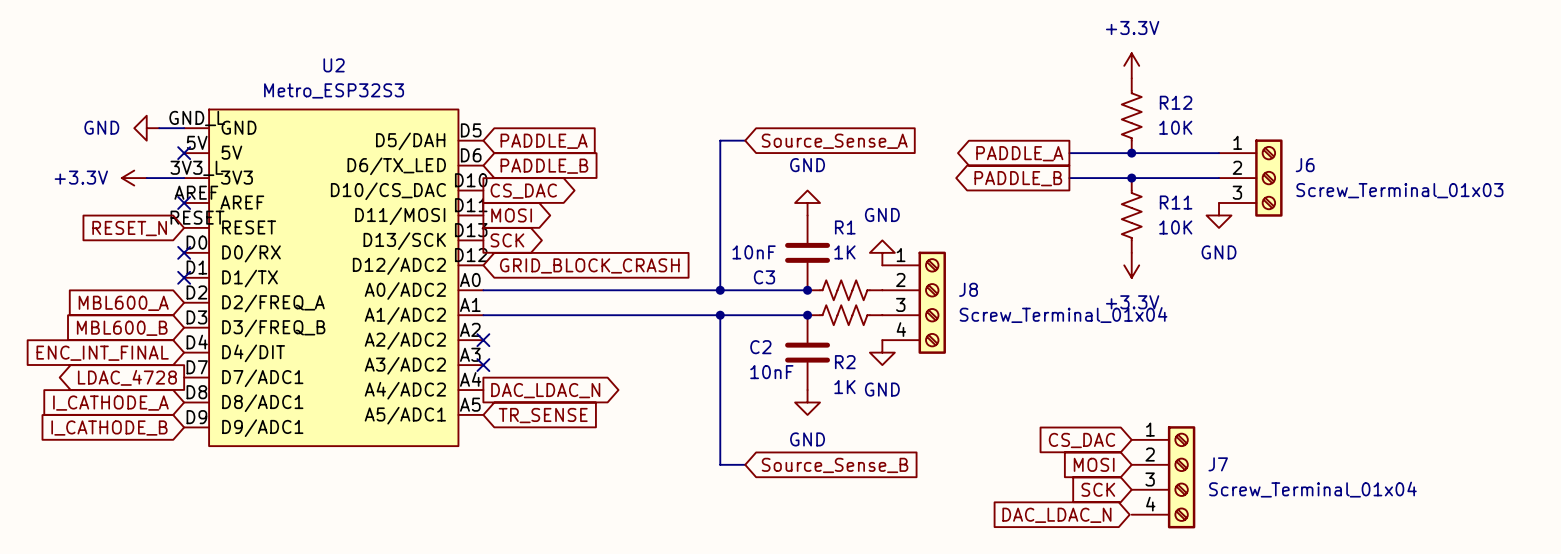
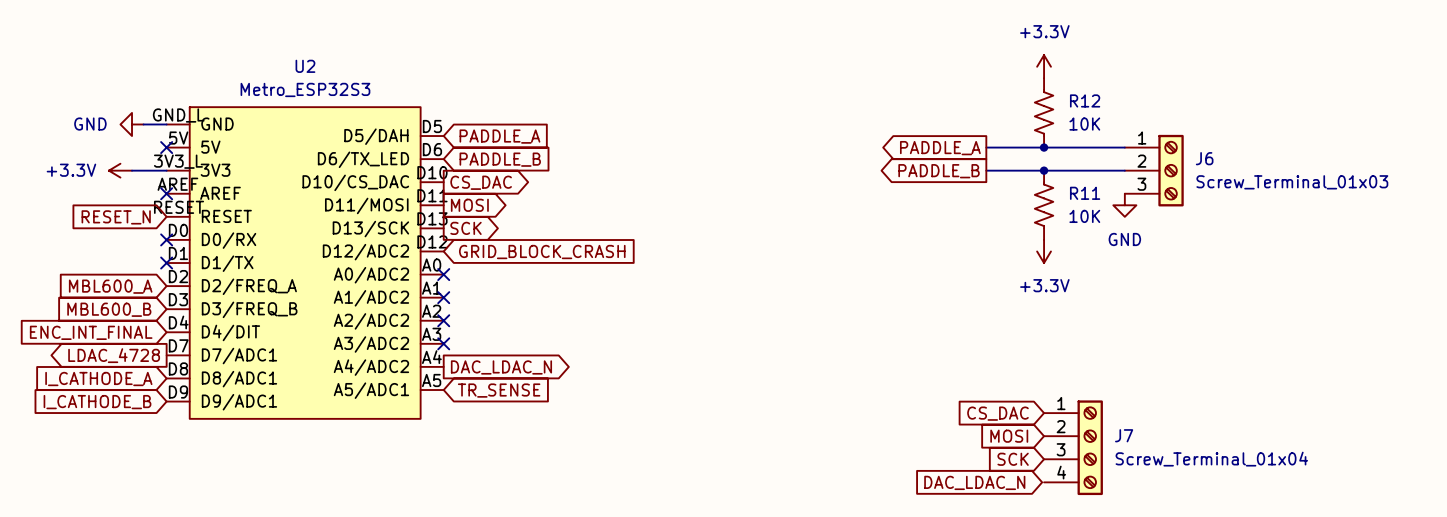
wire: (745, 140) (720, 140) (720, 290) -> none
global label: Source_Sense_A (834, 141) -> none
power symbol: GND (807, 203) -> none
C3: 10nF (807, 252) -> none
power symbol: GND (882, 252) -> none
wire: (483, 290) (807, 290) -> none
no-connect mark: none -> (443, 274)
junction: (720, 290) -> none
junction: (807, 290) -> none
R1: 1K (844, 290) -> none
J8: Screw_Terminal_01x04 (914, 302) -> none
wire: (483, 315) (807, 315) -> none
no-connect mark: none -> (443, 297)
wire: (720, 315) (720, 464) (745, 464) -> none
junction: (720, 315) -> none
junction: (807, 315) -> none
R2: 1K (844, 315) -> none
C2: 10nF (807, 352) -> none
power symbol: GND (882, 352) -> none
power symbol: GND (807, 402) -> none
global label: Source_Sense_B (835, 465) -> none

